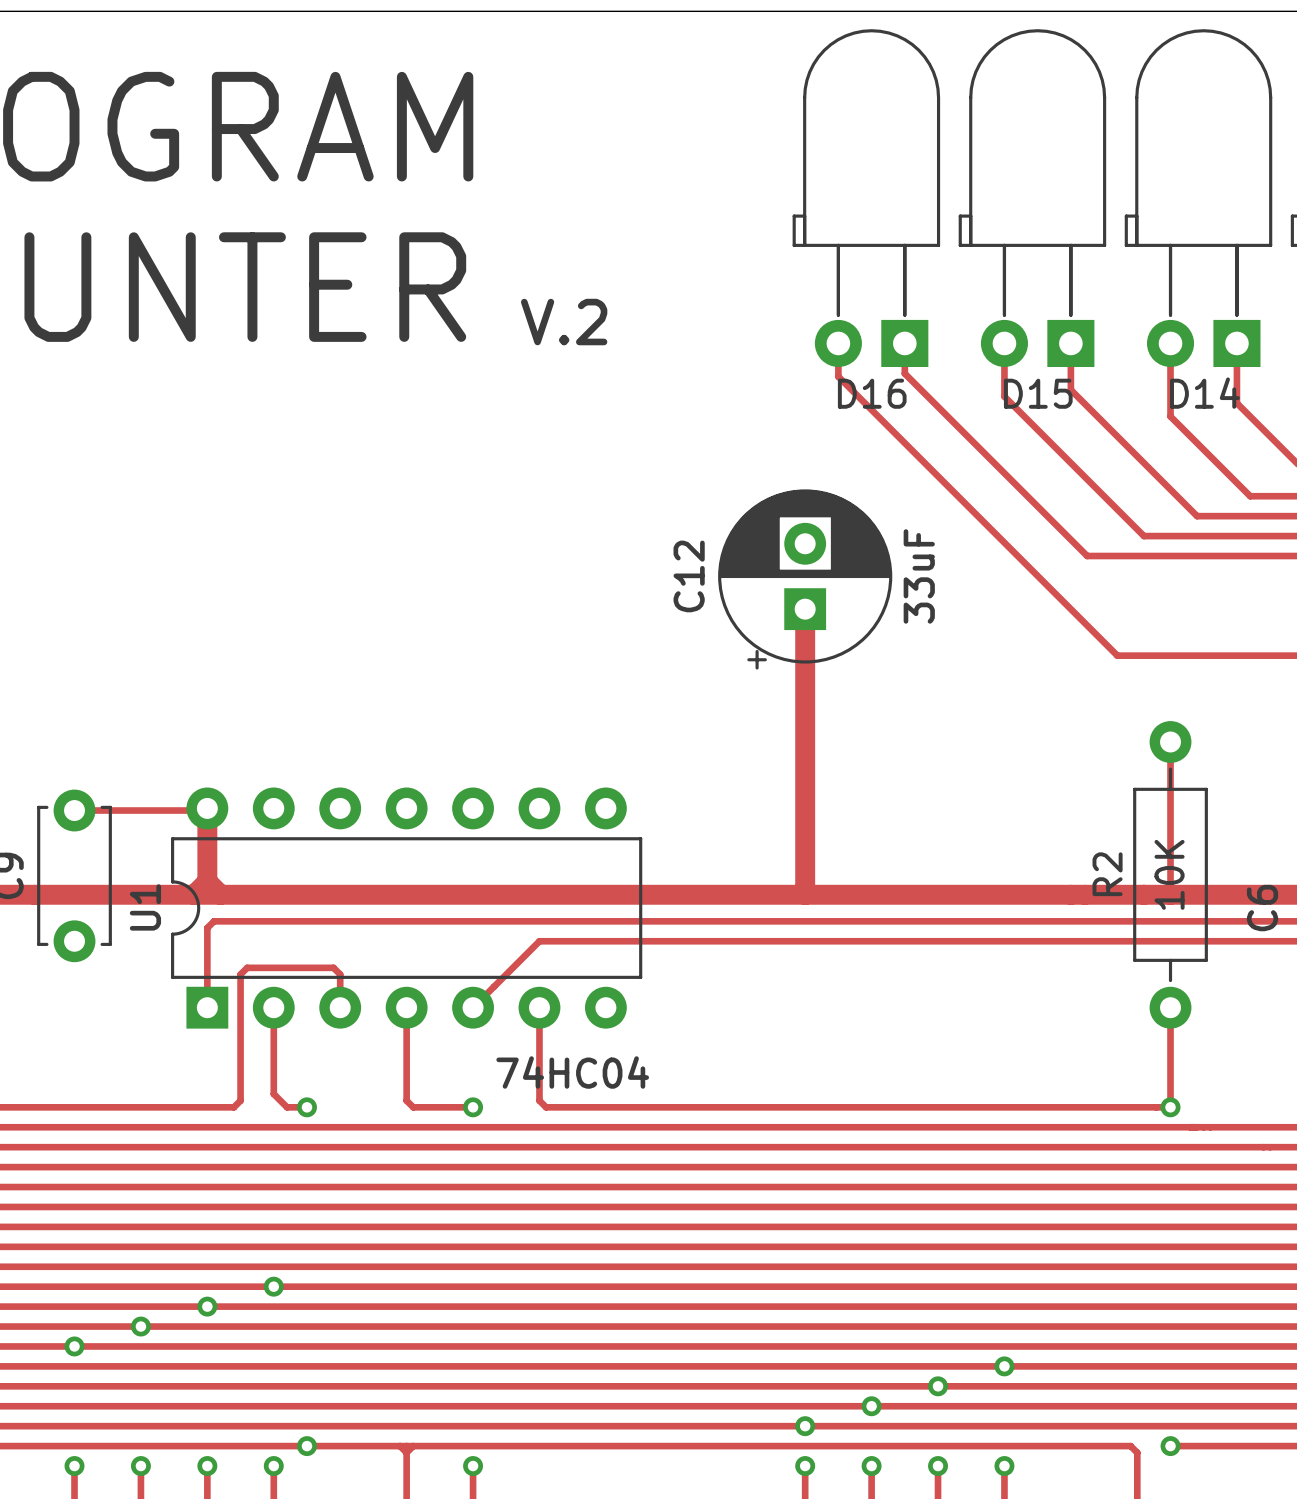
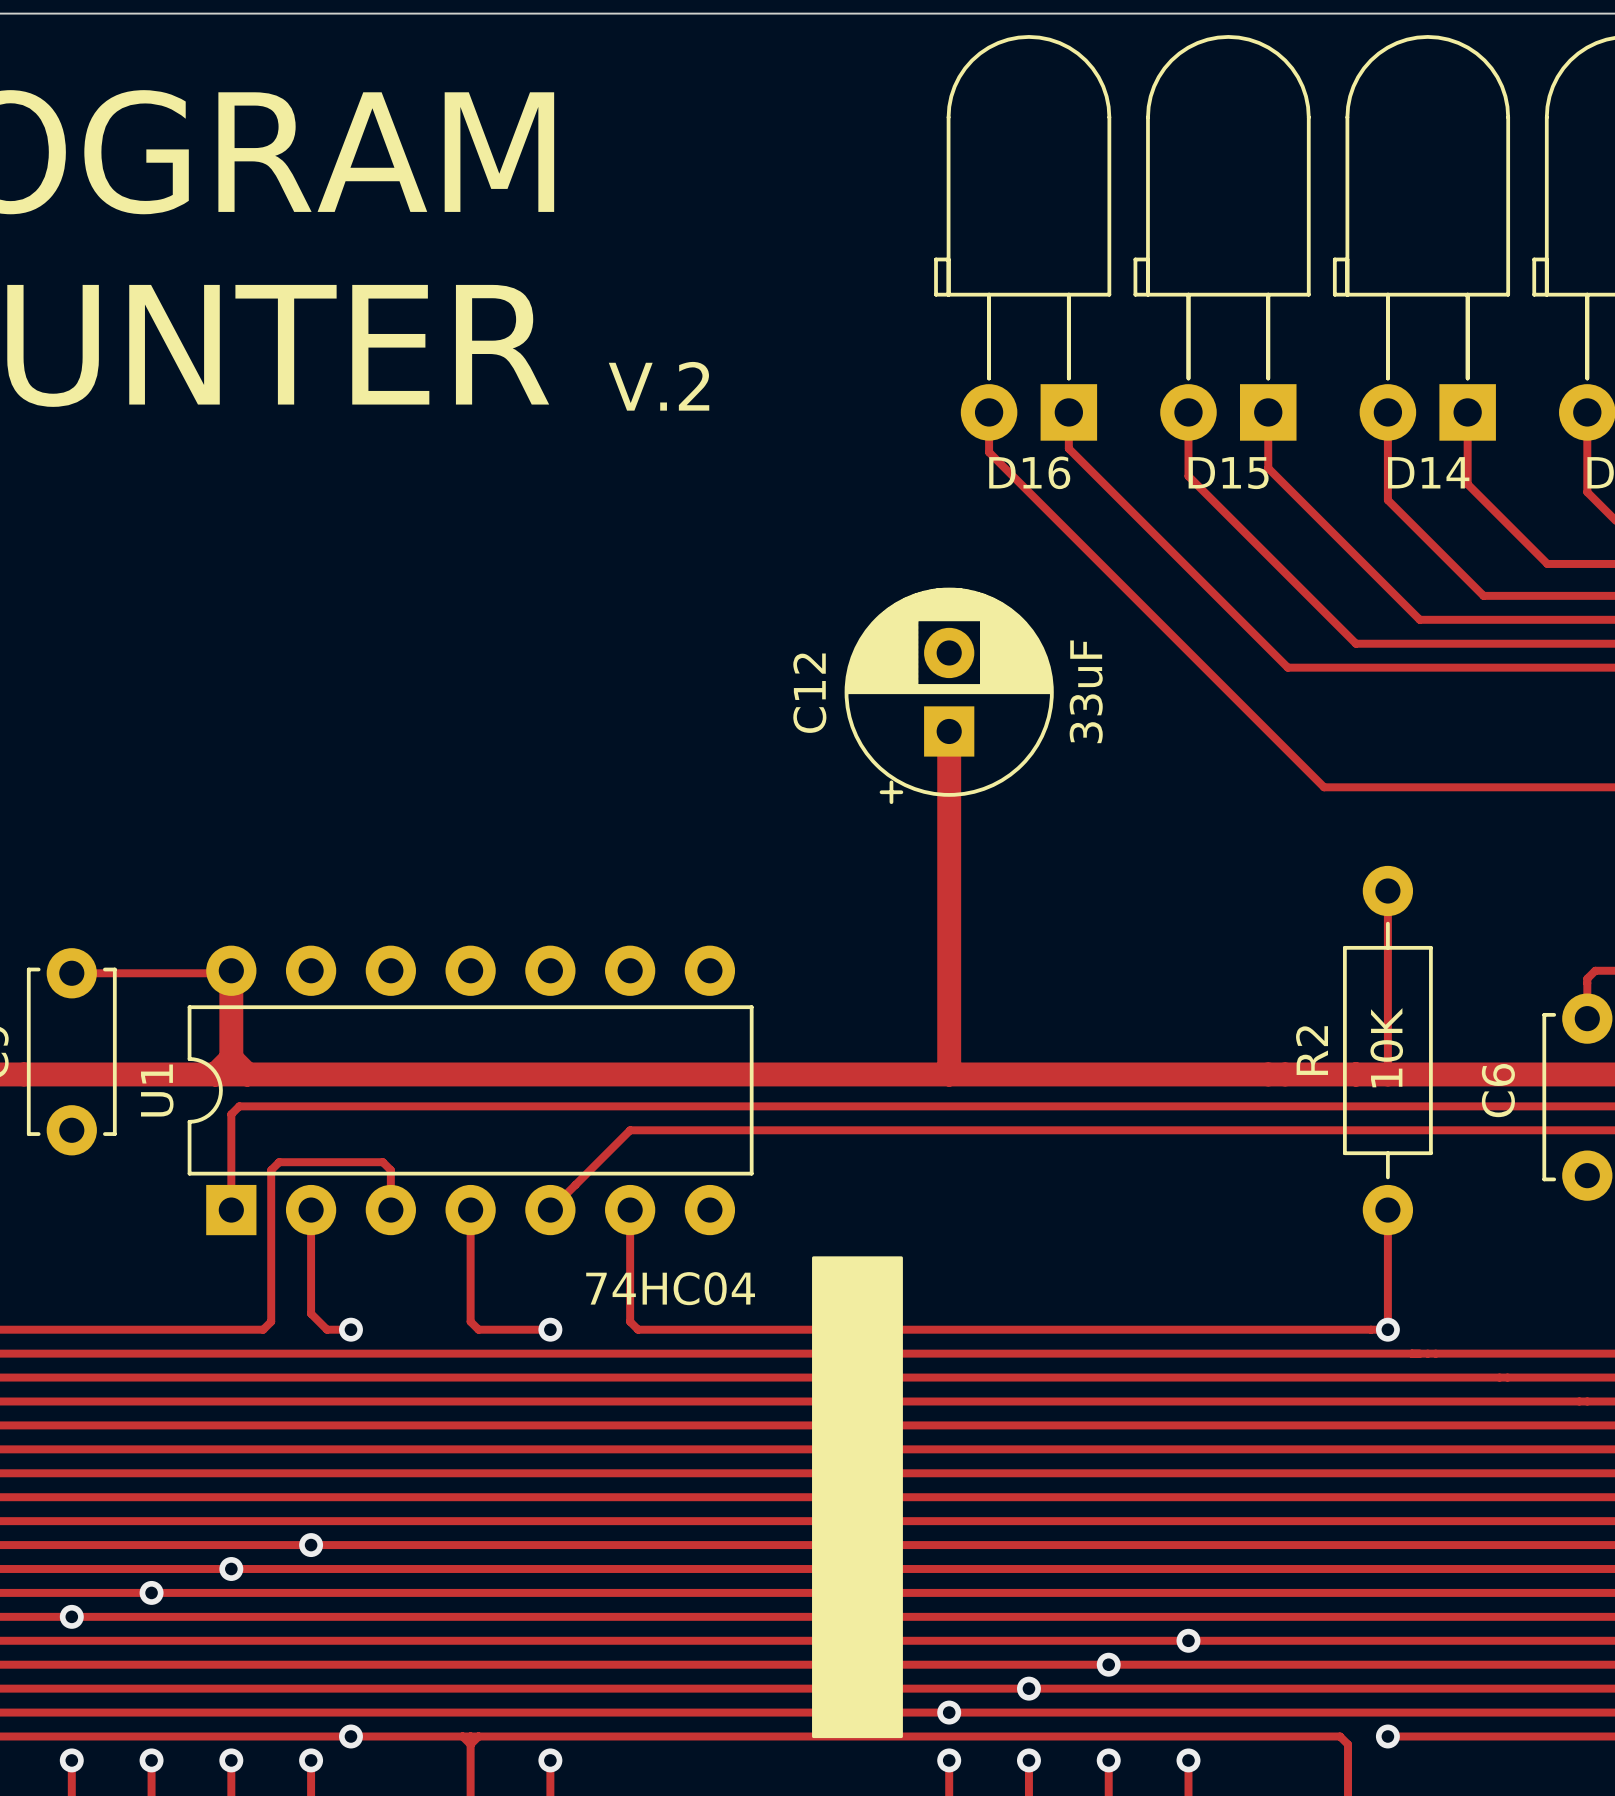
drawing: none -> [812, 1256, 903, 1739]

